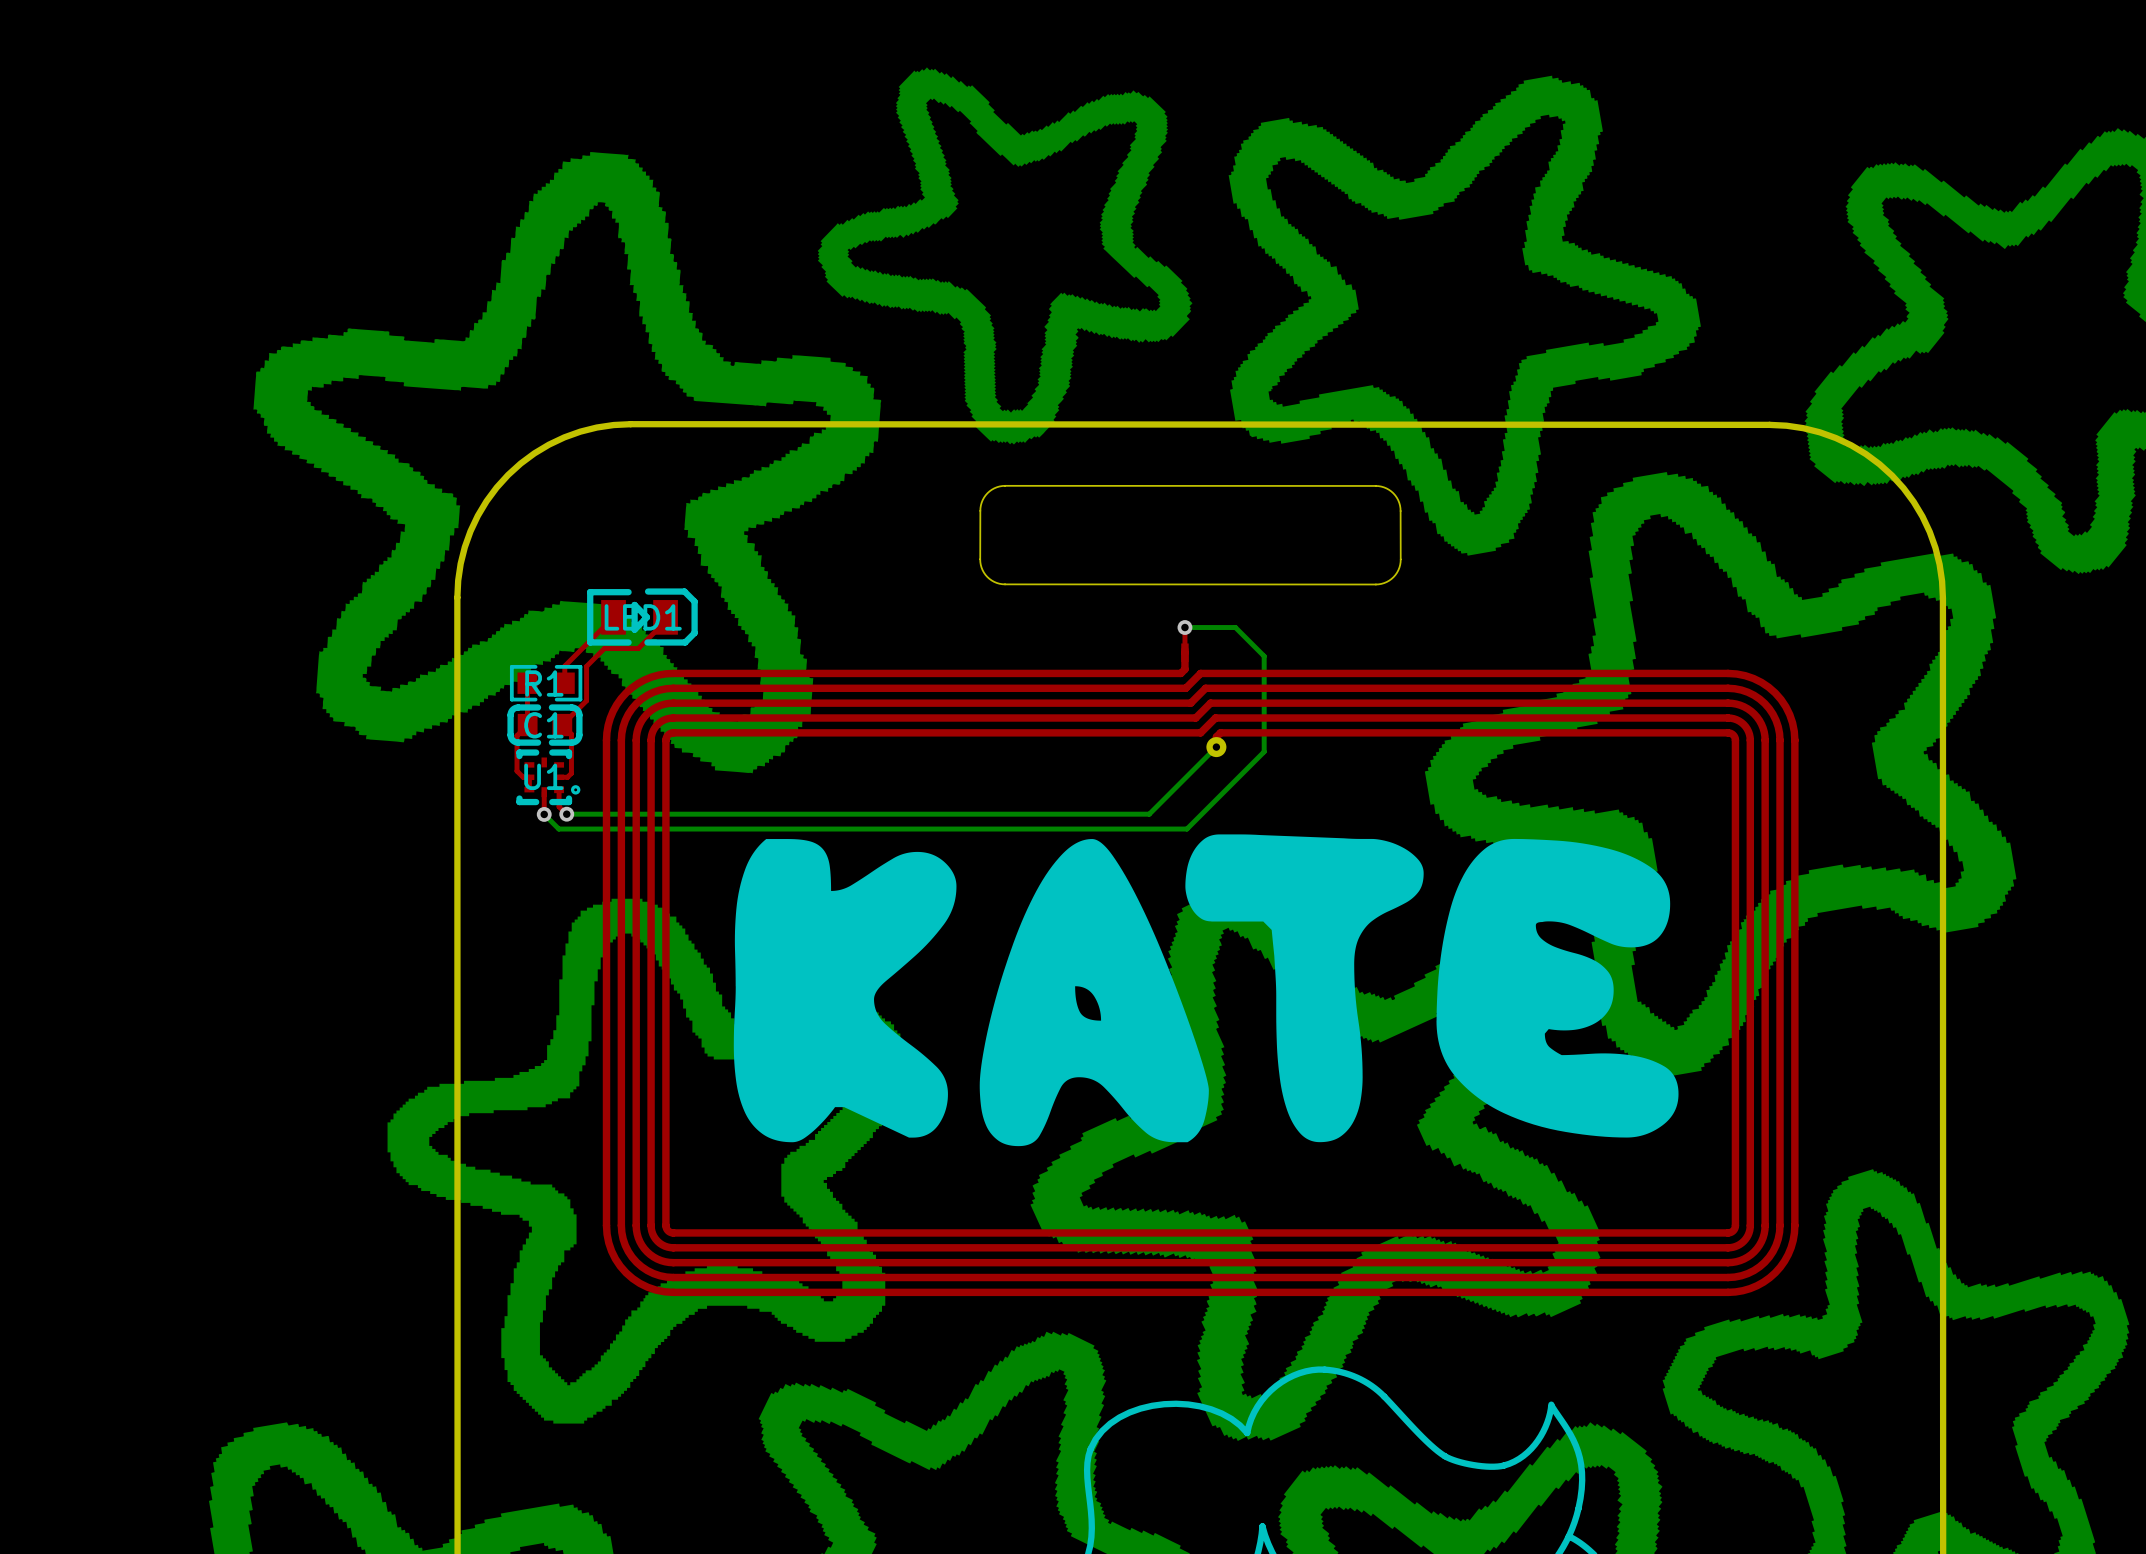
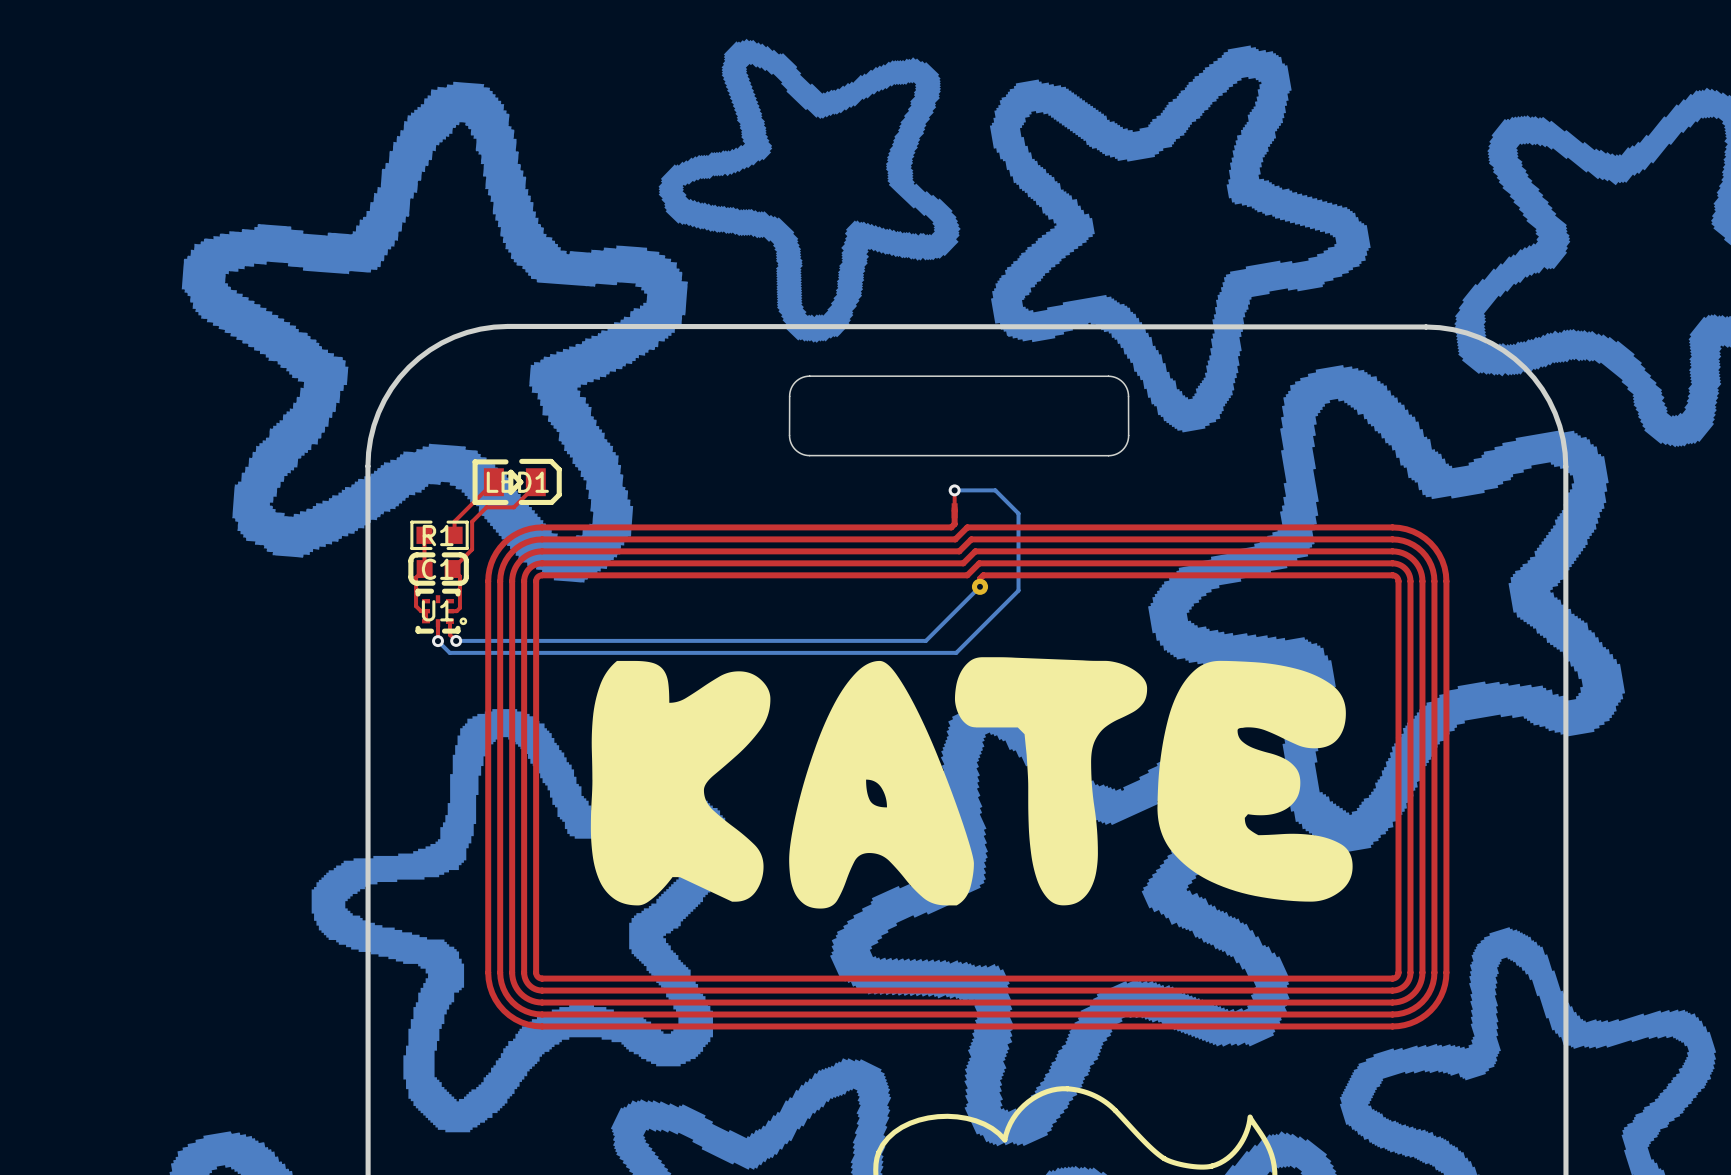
drawing position: (567, 462) -> (434, 332)

